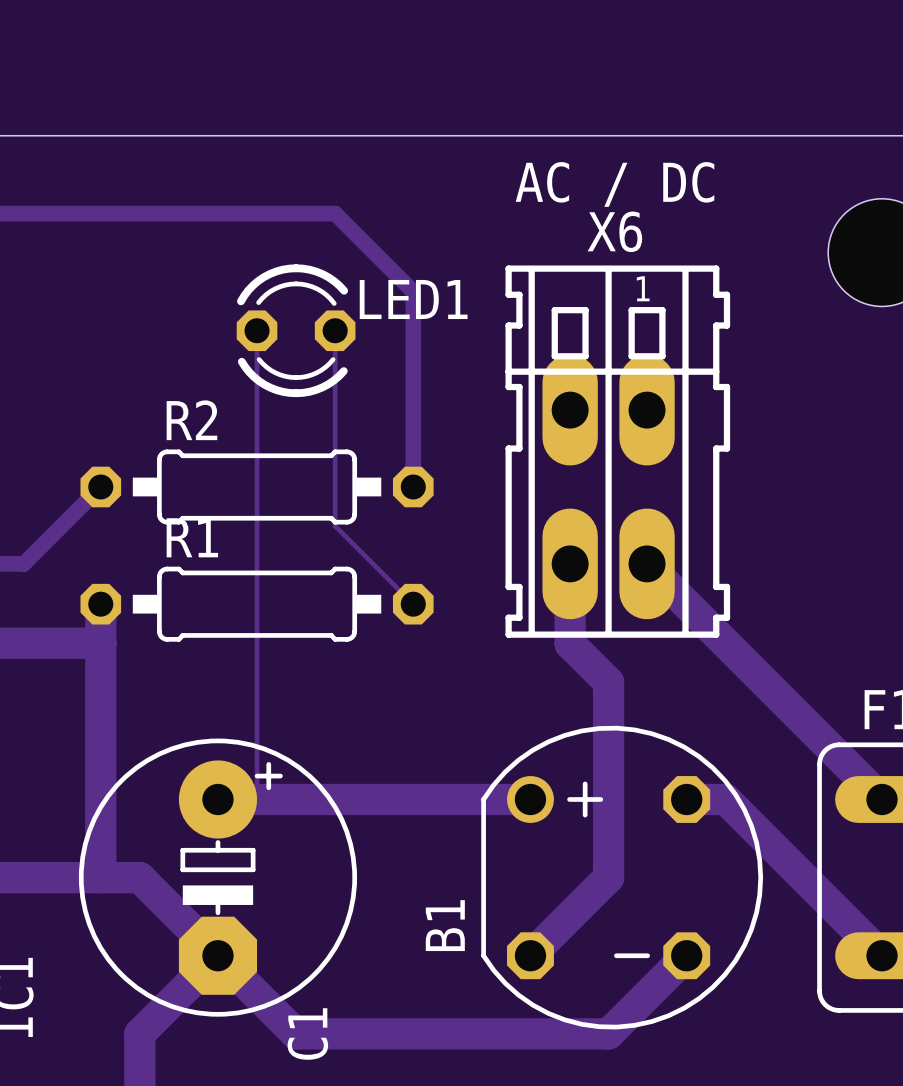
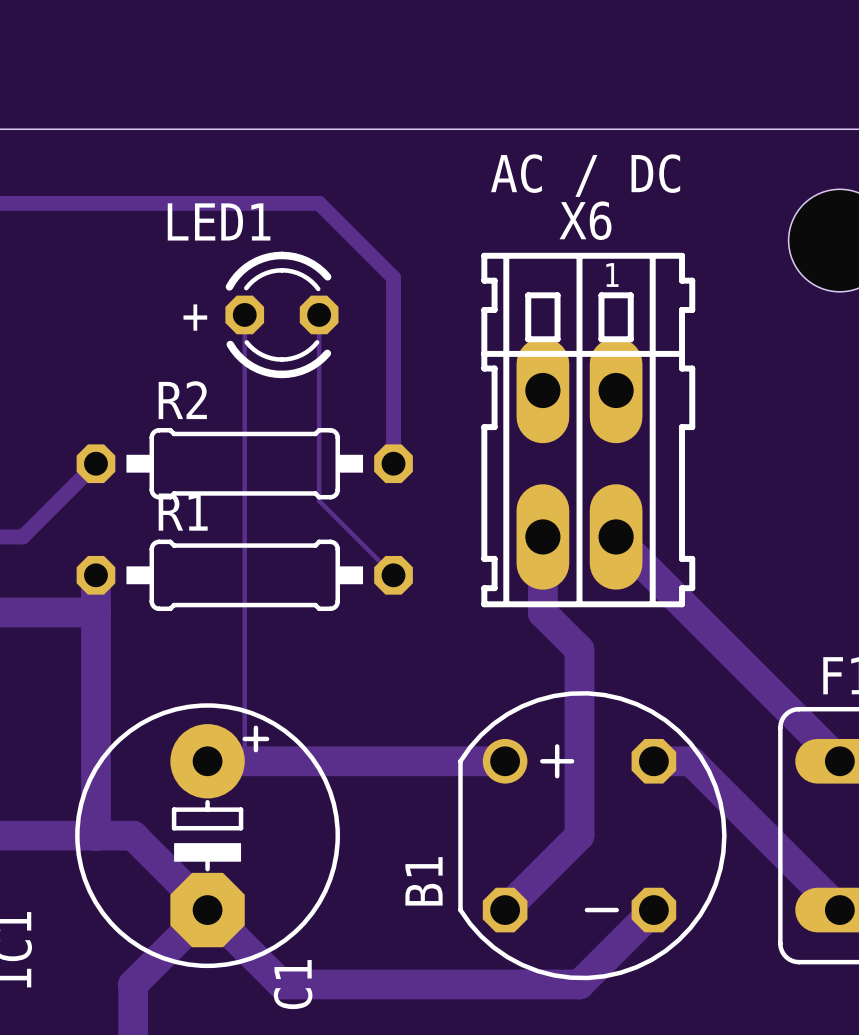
LED1 name position: LED1 (413, 299) -> LED1 (219, 221)
text: none -> + (195, 317)

